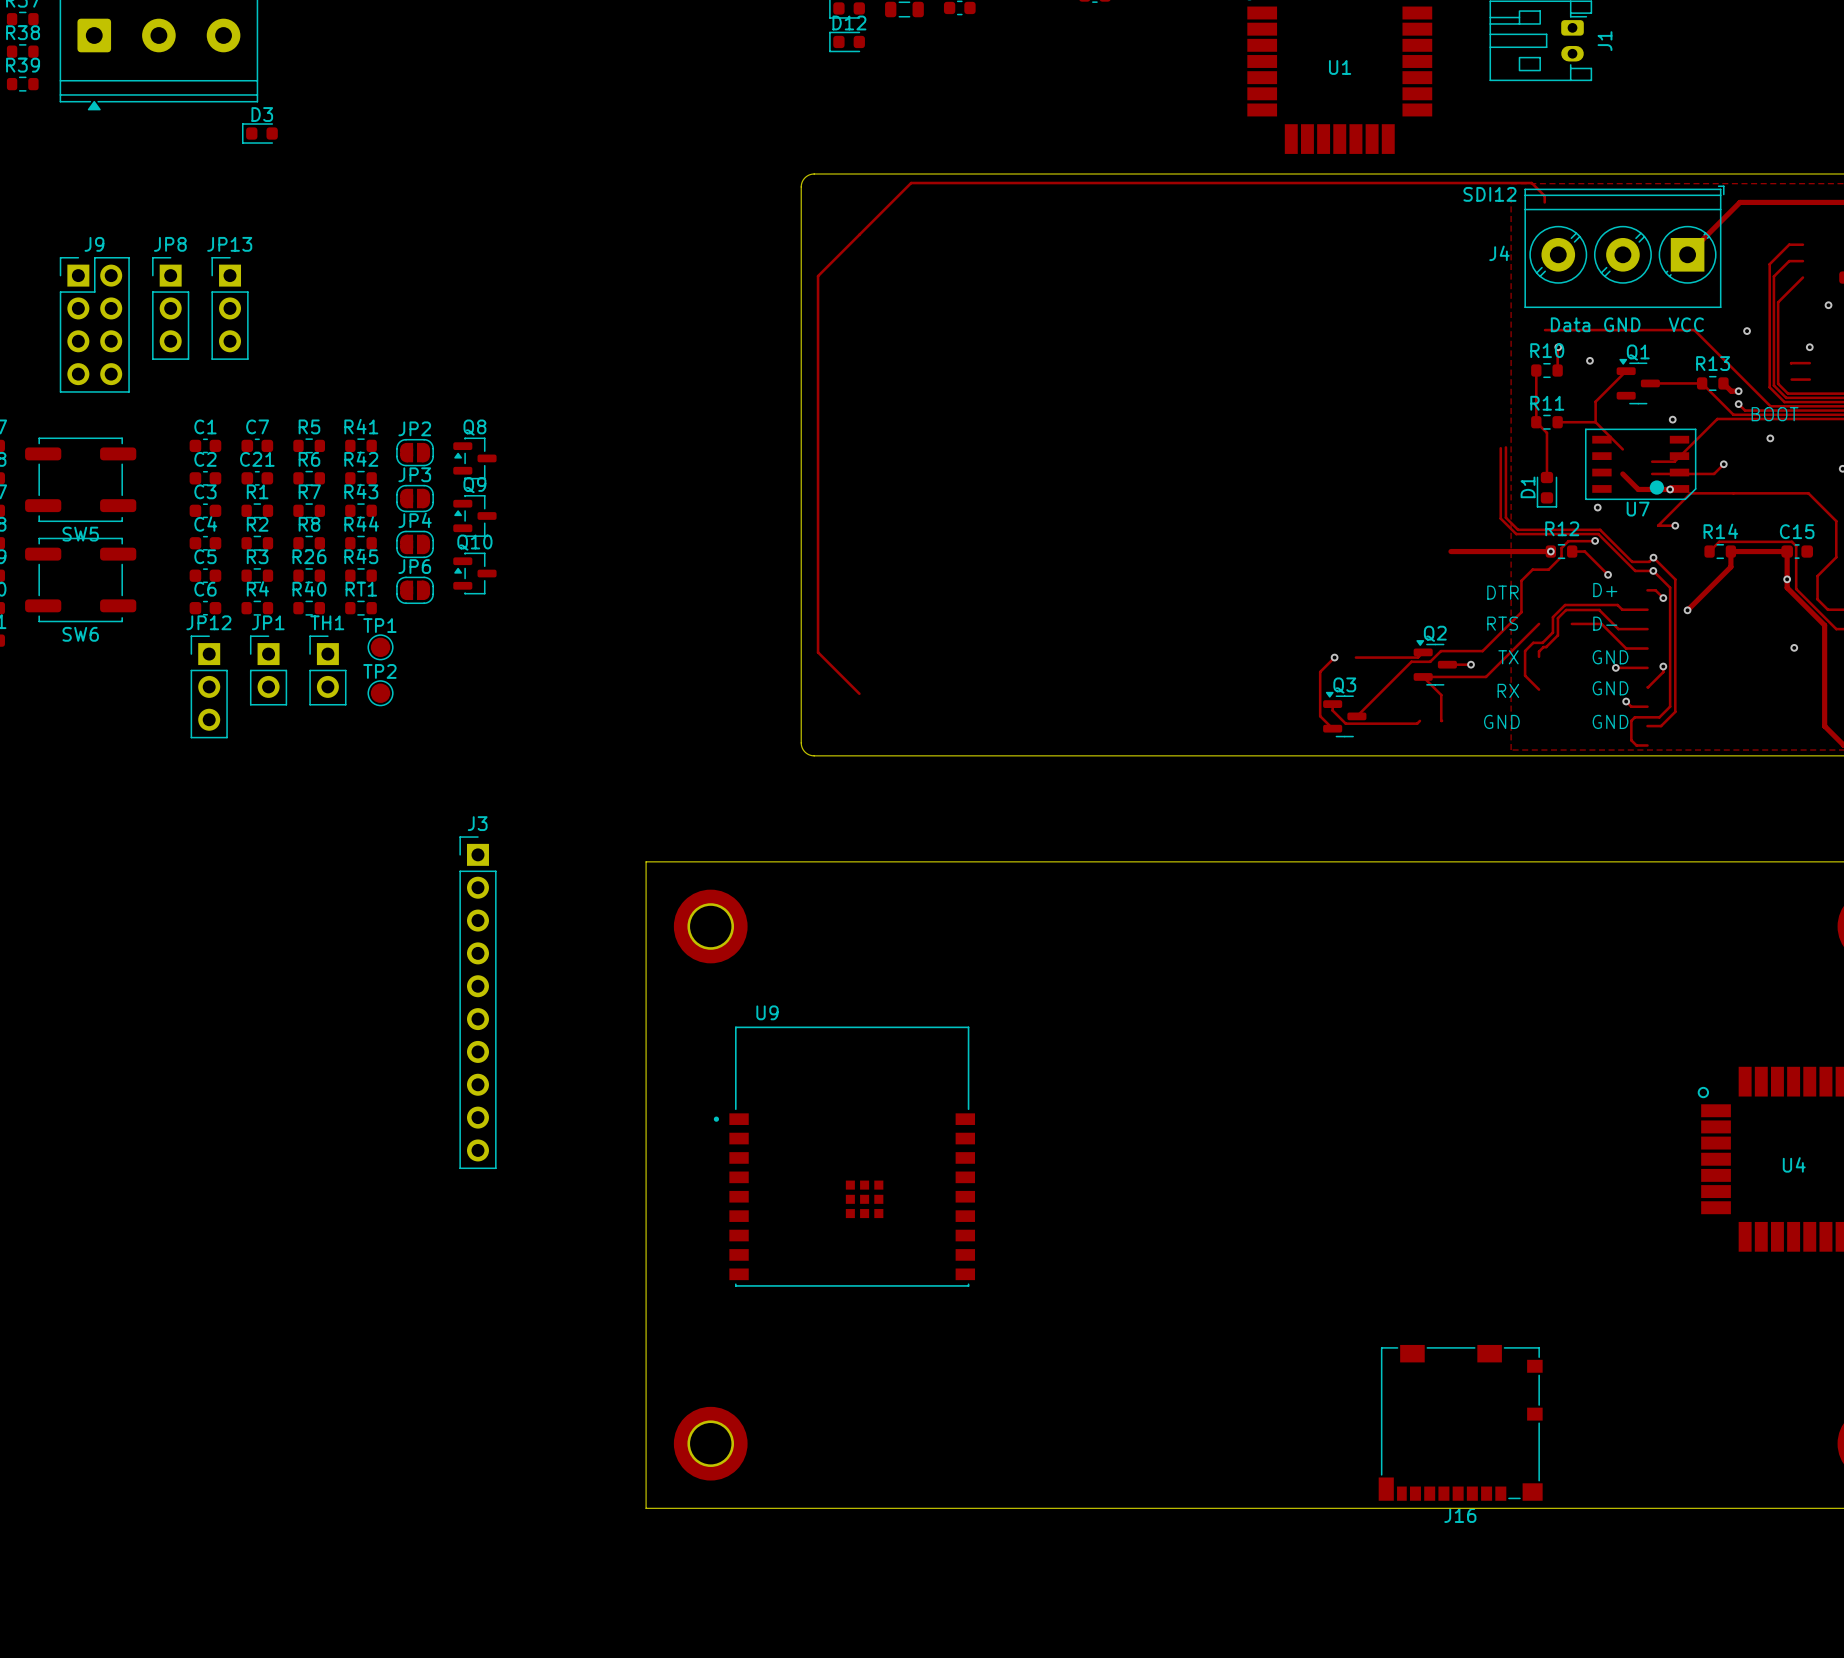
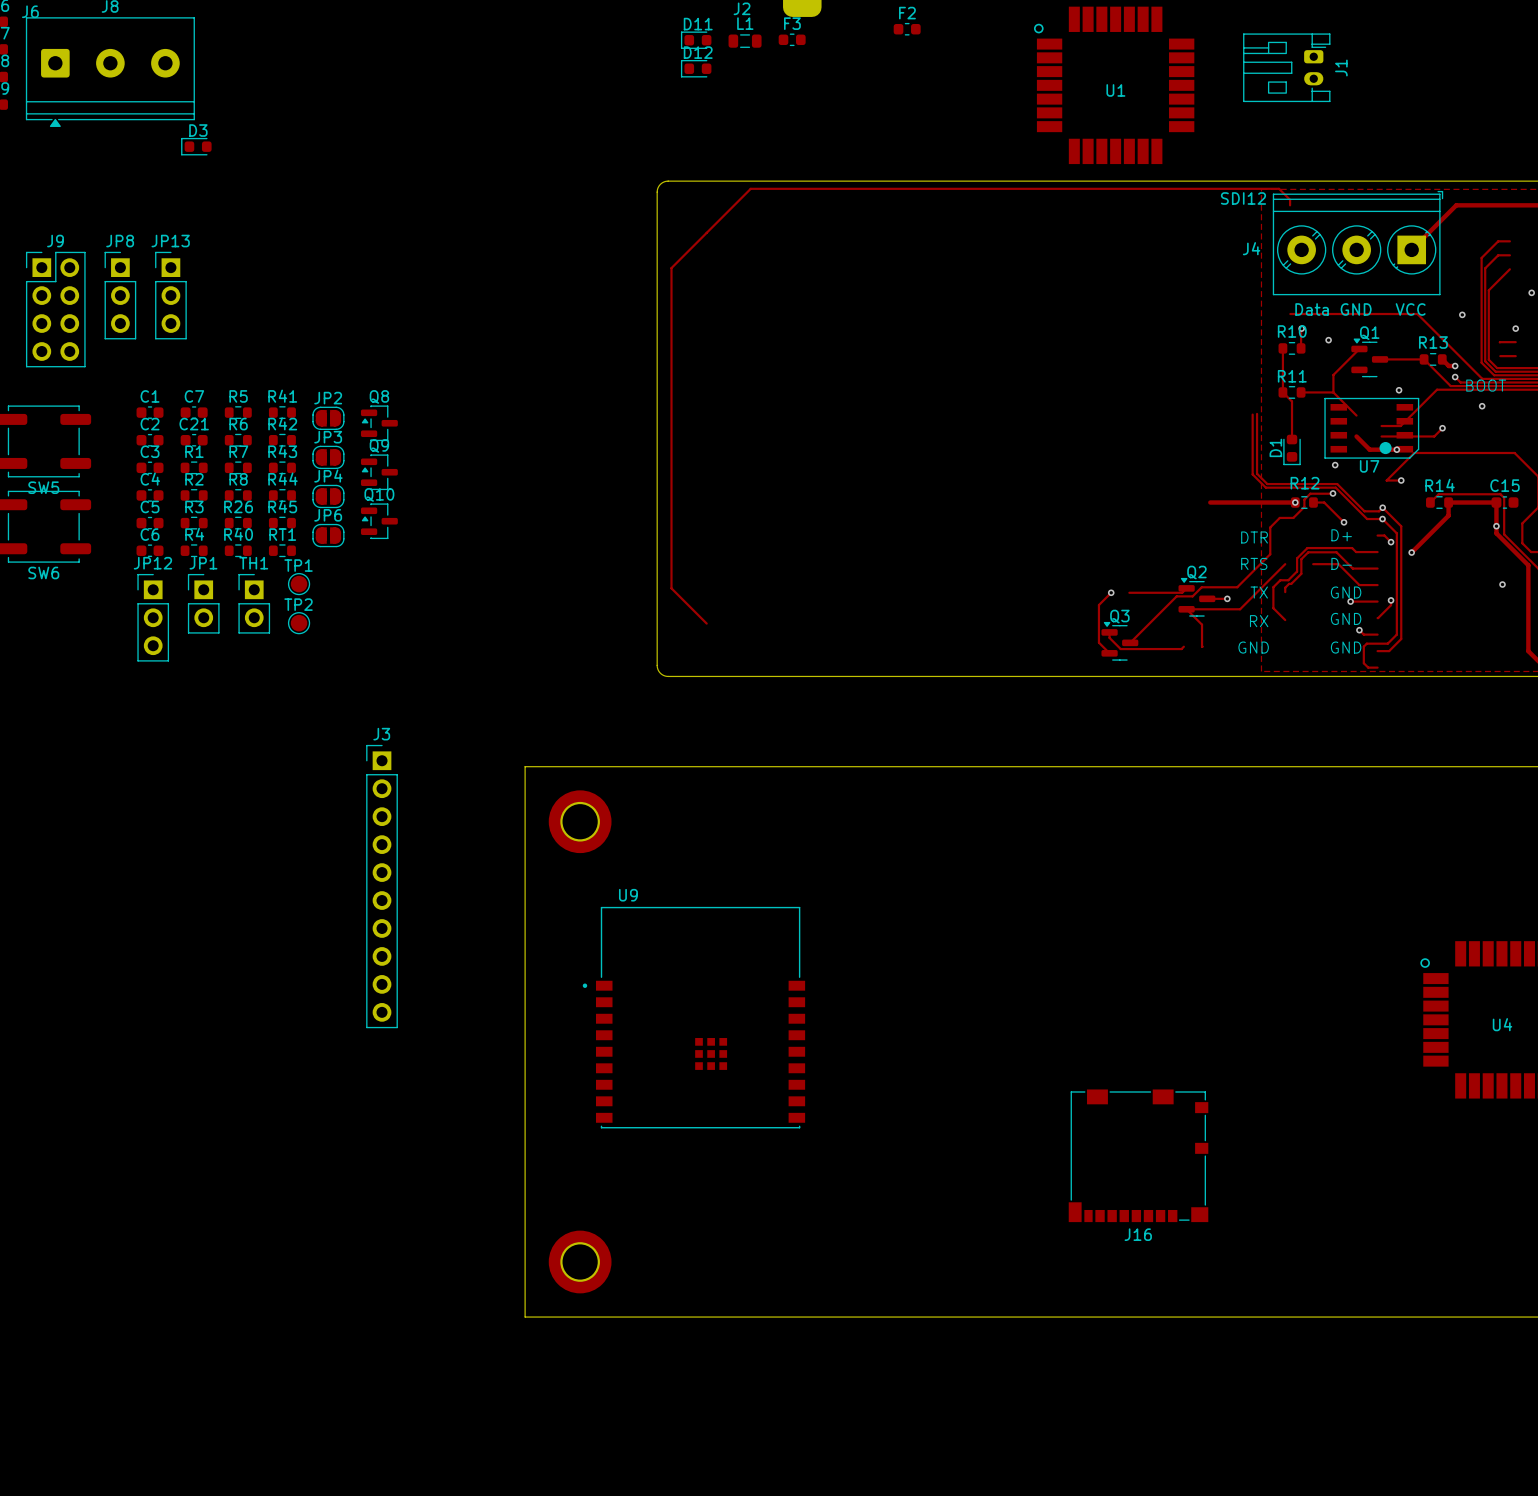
J16 position: (1460, 1422) -> (1138, 1155)

